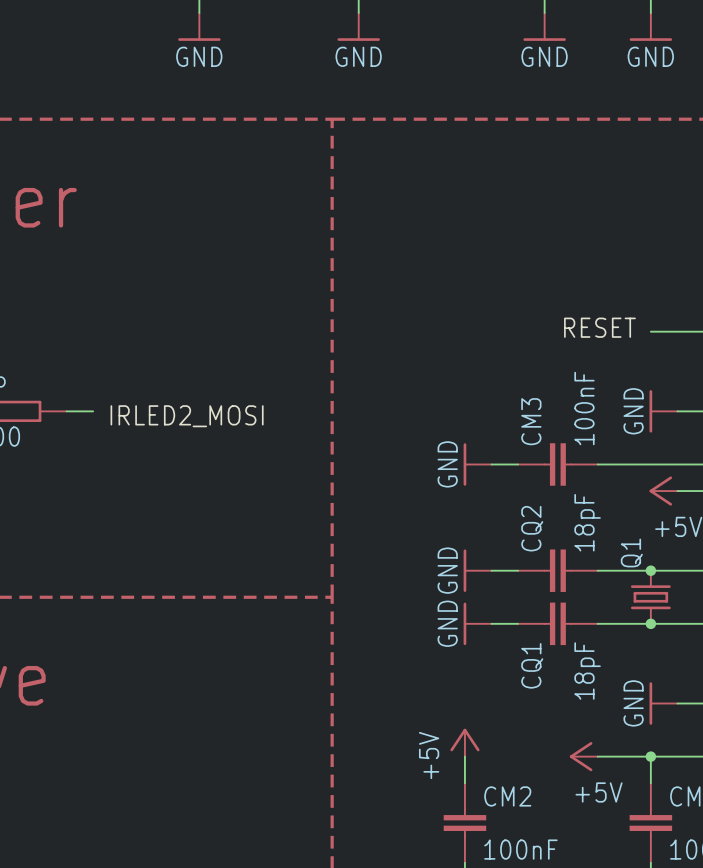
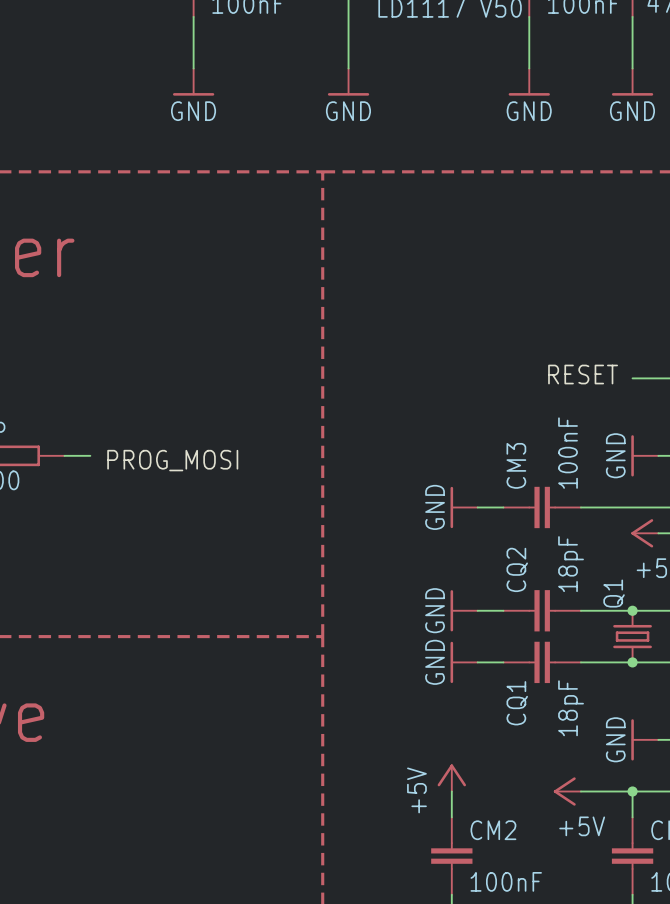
label: IRLED2_MOSI (187, 416) -> PROG_MOSI (172, 460)

